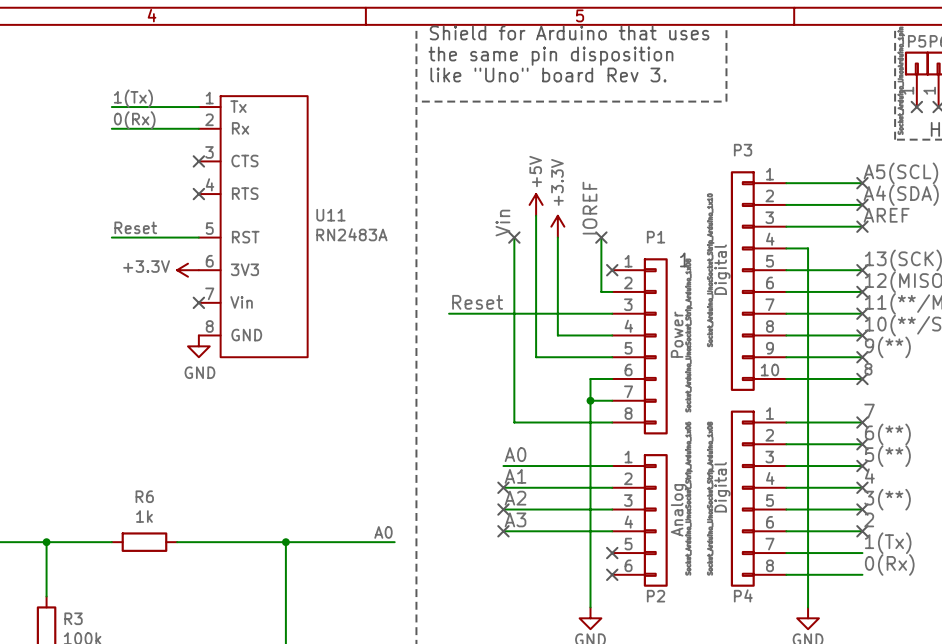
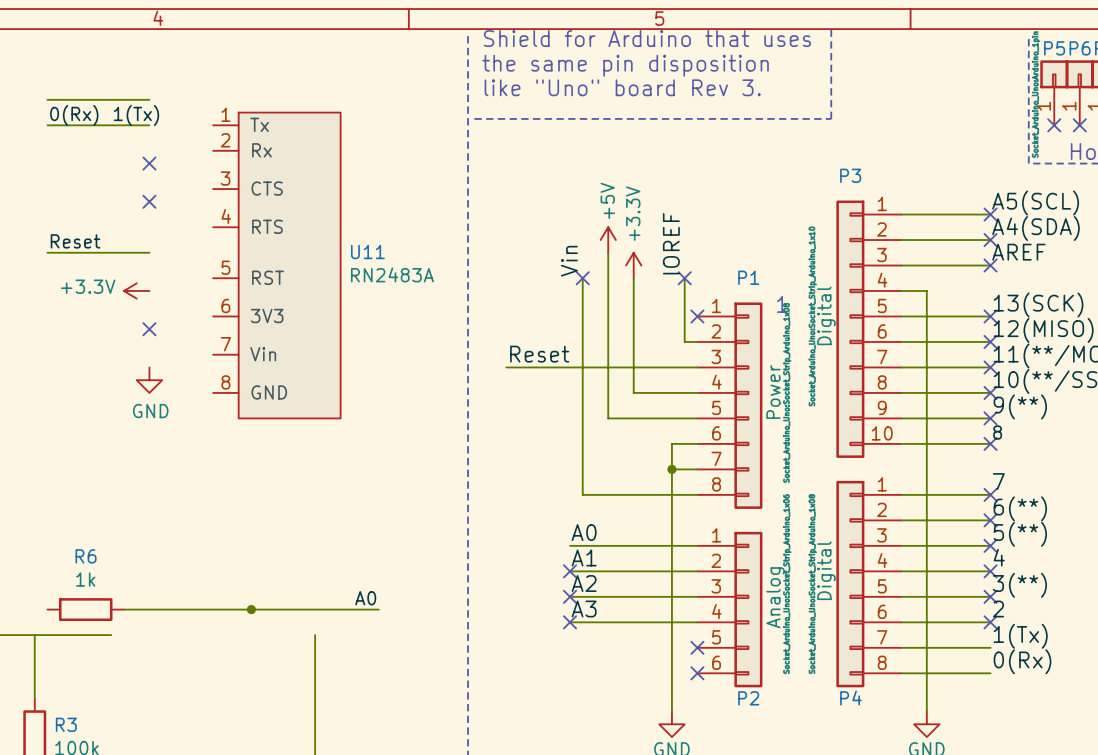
wire: (144, 107) (198, 107) -> (47, 125) (111, 125)
label position: 0(Rx) (134, 120) -> 0(Rx) (74, 115)
wire: (111, 128) (198, 128) -> (47, 99) (149, 99)
no-connect mark: none -> (149, 163)
no-connect mark: (198, 161) -> none
no-connect mark: none -> (149, 201)
no-connect mark: (198, 194) -> none
label position: Reset (135, 227) -> Reset (75, 241)
wire: (111, 237) (198, 237) -> (47, 252) (149, 252)
power symbol position: +3.3V (187, 270) -> +3.3V (136, 290)
no-connect mark: none -> (149, 329)
no-connect mark: (198, 302) -> none
power symbol position: GND (198, 346) -> GND (149, 380)
junction: none -> (251, 609)
label position: A0 (383, 532) -> A0 (365, 598)
junction: (46, 542) -> none
R6 position: (144, 542) -> (85, 609)
wire: (177, 542) (394, 542) -> (123, 609) (378, 609)
junction: (285, 542) -> none

